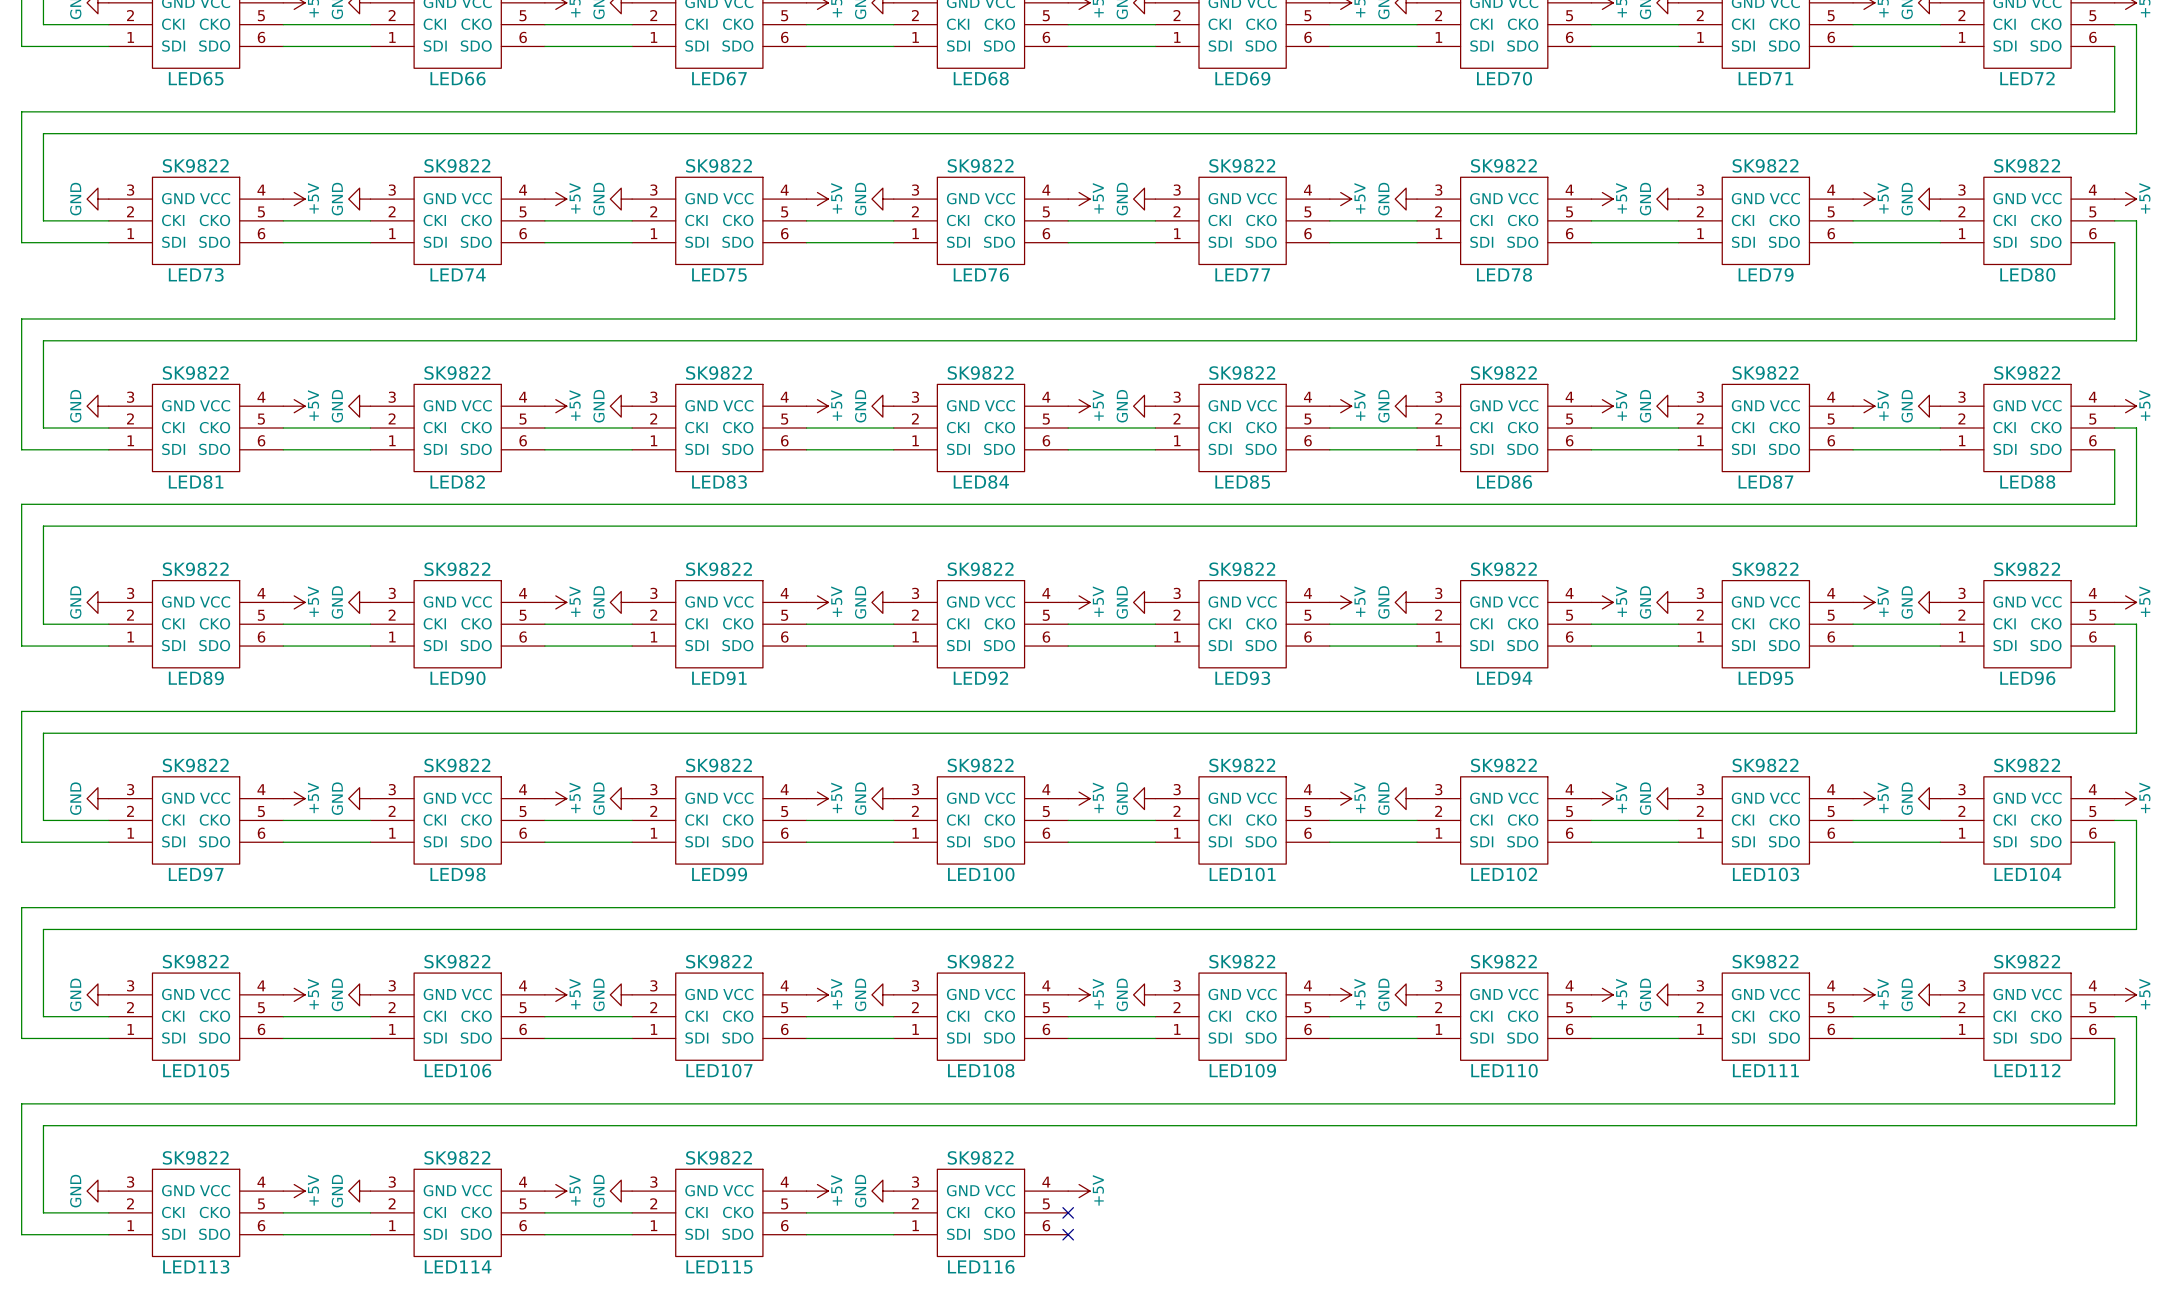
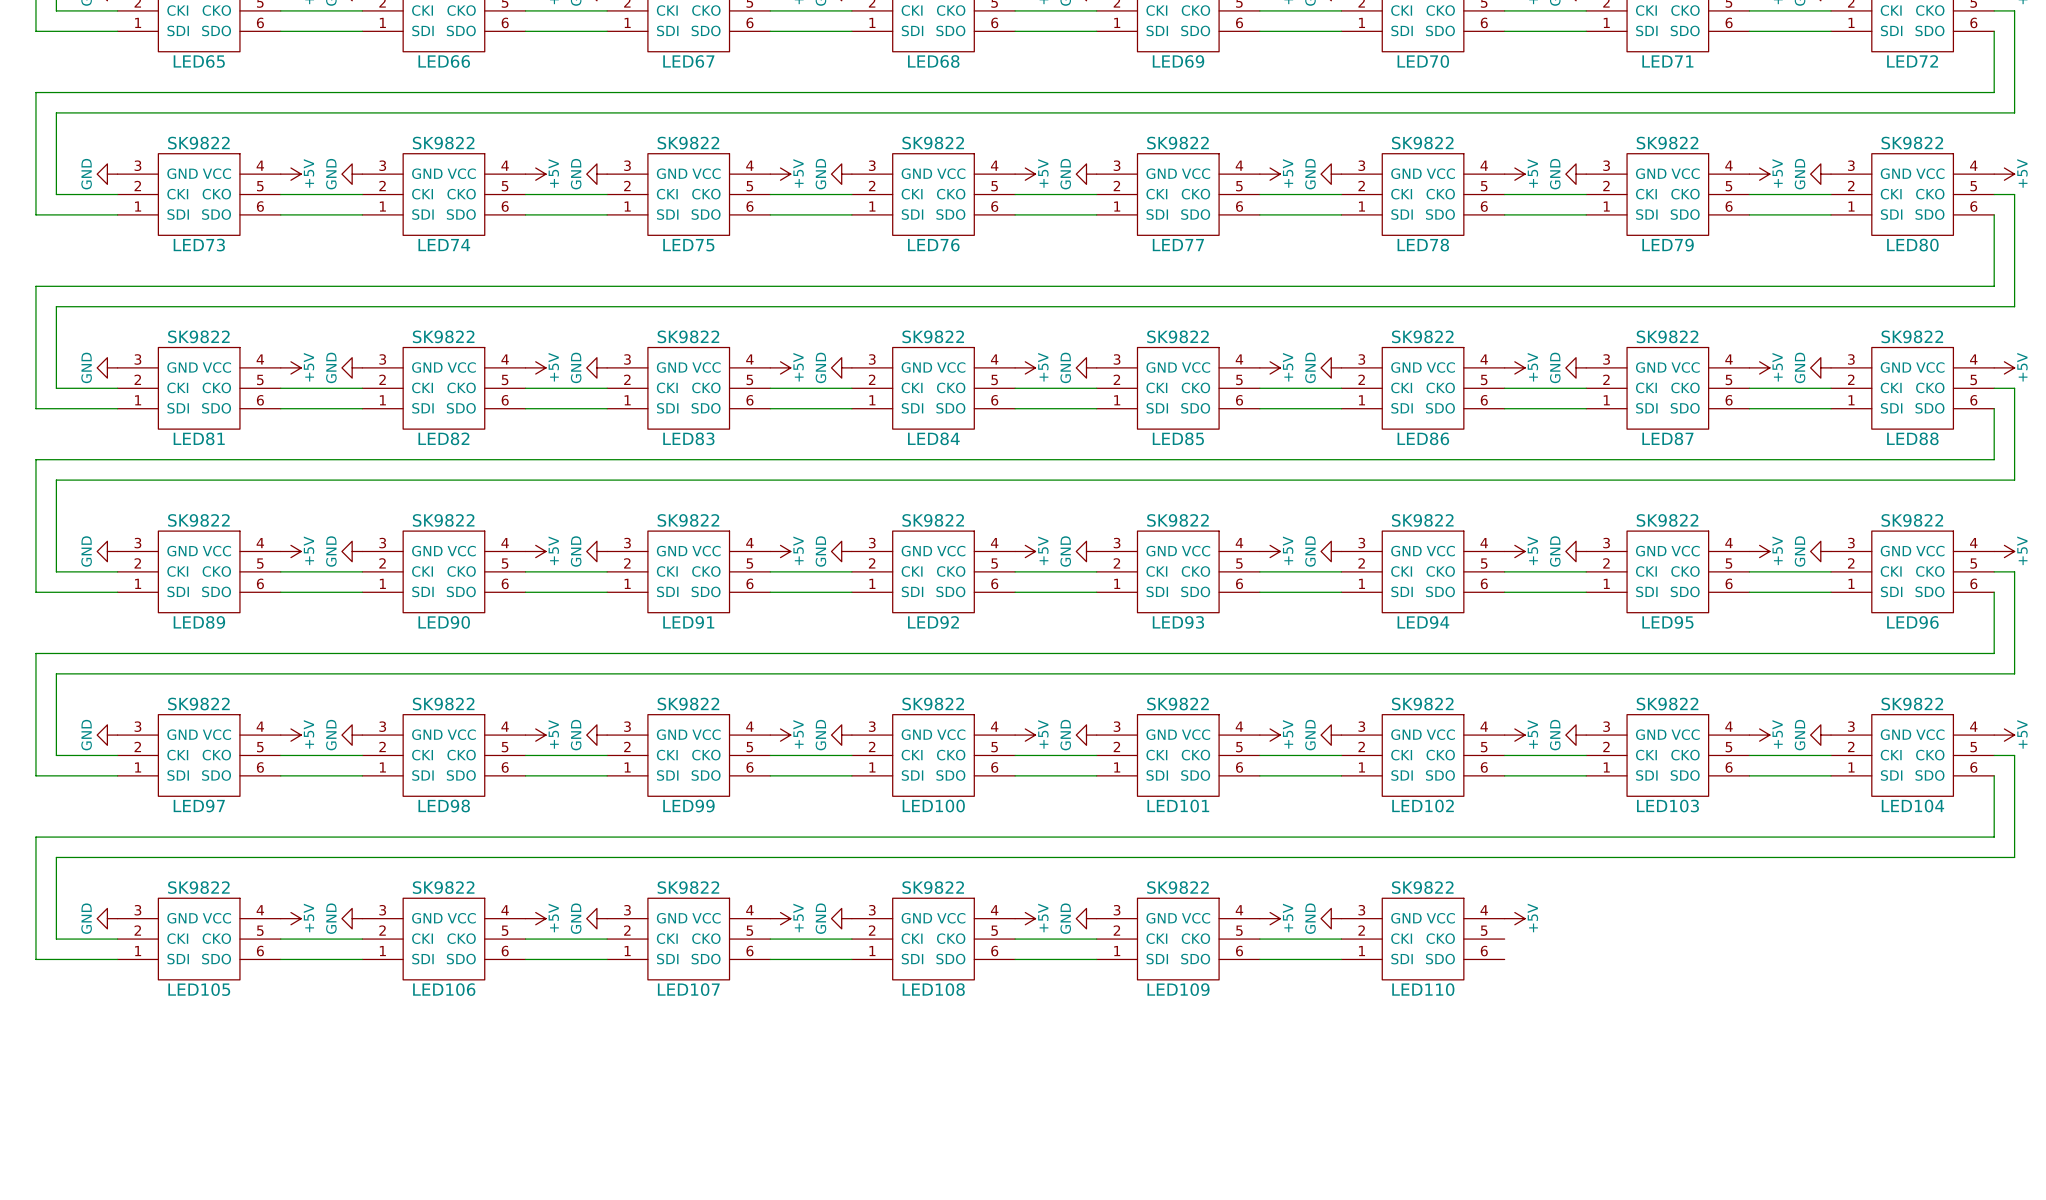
power symbol: GND (1667, 994) -> none
power symbol: +5V (1863, 994) -> none
power symbol: GND (1929, 994) -> none
power symbol: +5V (2125, 994) -> none
wire: (1591, 1016) (1678, 1016) -> none
LED111: SK9822 (1765, 1016) -> none
wire: (1853, 1016) (1940, 1016) -> none
LED112: SK9822 (2027, 1016) -> none
wire: (2114, 1016) (2136, 1016) (2136, 1125) (43, 1125) (43, 1212) (108, 1212) -> none
wire: (1591, 1038) (1678, 1038) -> none
wire: (1853, 1038) (1940, 1038) -> none
wire: (2114, 1038) (2114, 1103) (21, 1103) (21, 1234) (108, 1234) -> none
power symbol: GND (97, 1191) -> none
power symbol: +5V (294, 1191) -> none
power symbol: GND (359, 1191) -> none
power symbol: +5V (555, 1191) -> none
power symbol: GND (621, 1191) -> none
power symbol: +5V (817, 1191) -> none
power symbol: GND (882, 1191) -> none
power symbol: +5V (1079, 1191) -> none
LED113: SK9822 (196, 1212) -> none
wire: (283, 1212) (370, 1212) -> none
LED114: SK9822 (457, 1212) -> none
wire: (544, 1212) (632, 1212) -> none
LED115: SK9822 (719, 1212) -> none
wire: (806, 1212) (893, 1212) -> none
LED116: SK9822 (980, 1212) -> none
no-connect mark: (1068, 1212) -> none
wire: (283, 1234) (370, 1234) -> none
wire: (544, 1234) (632, 1234) -> none
wire: (806, 1234) (893, 1234) -> none
no-connect mark: (1068, 1234) -> none

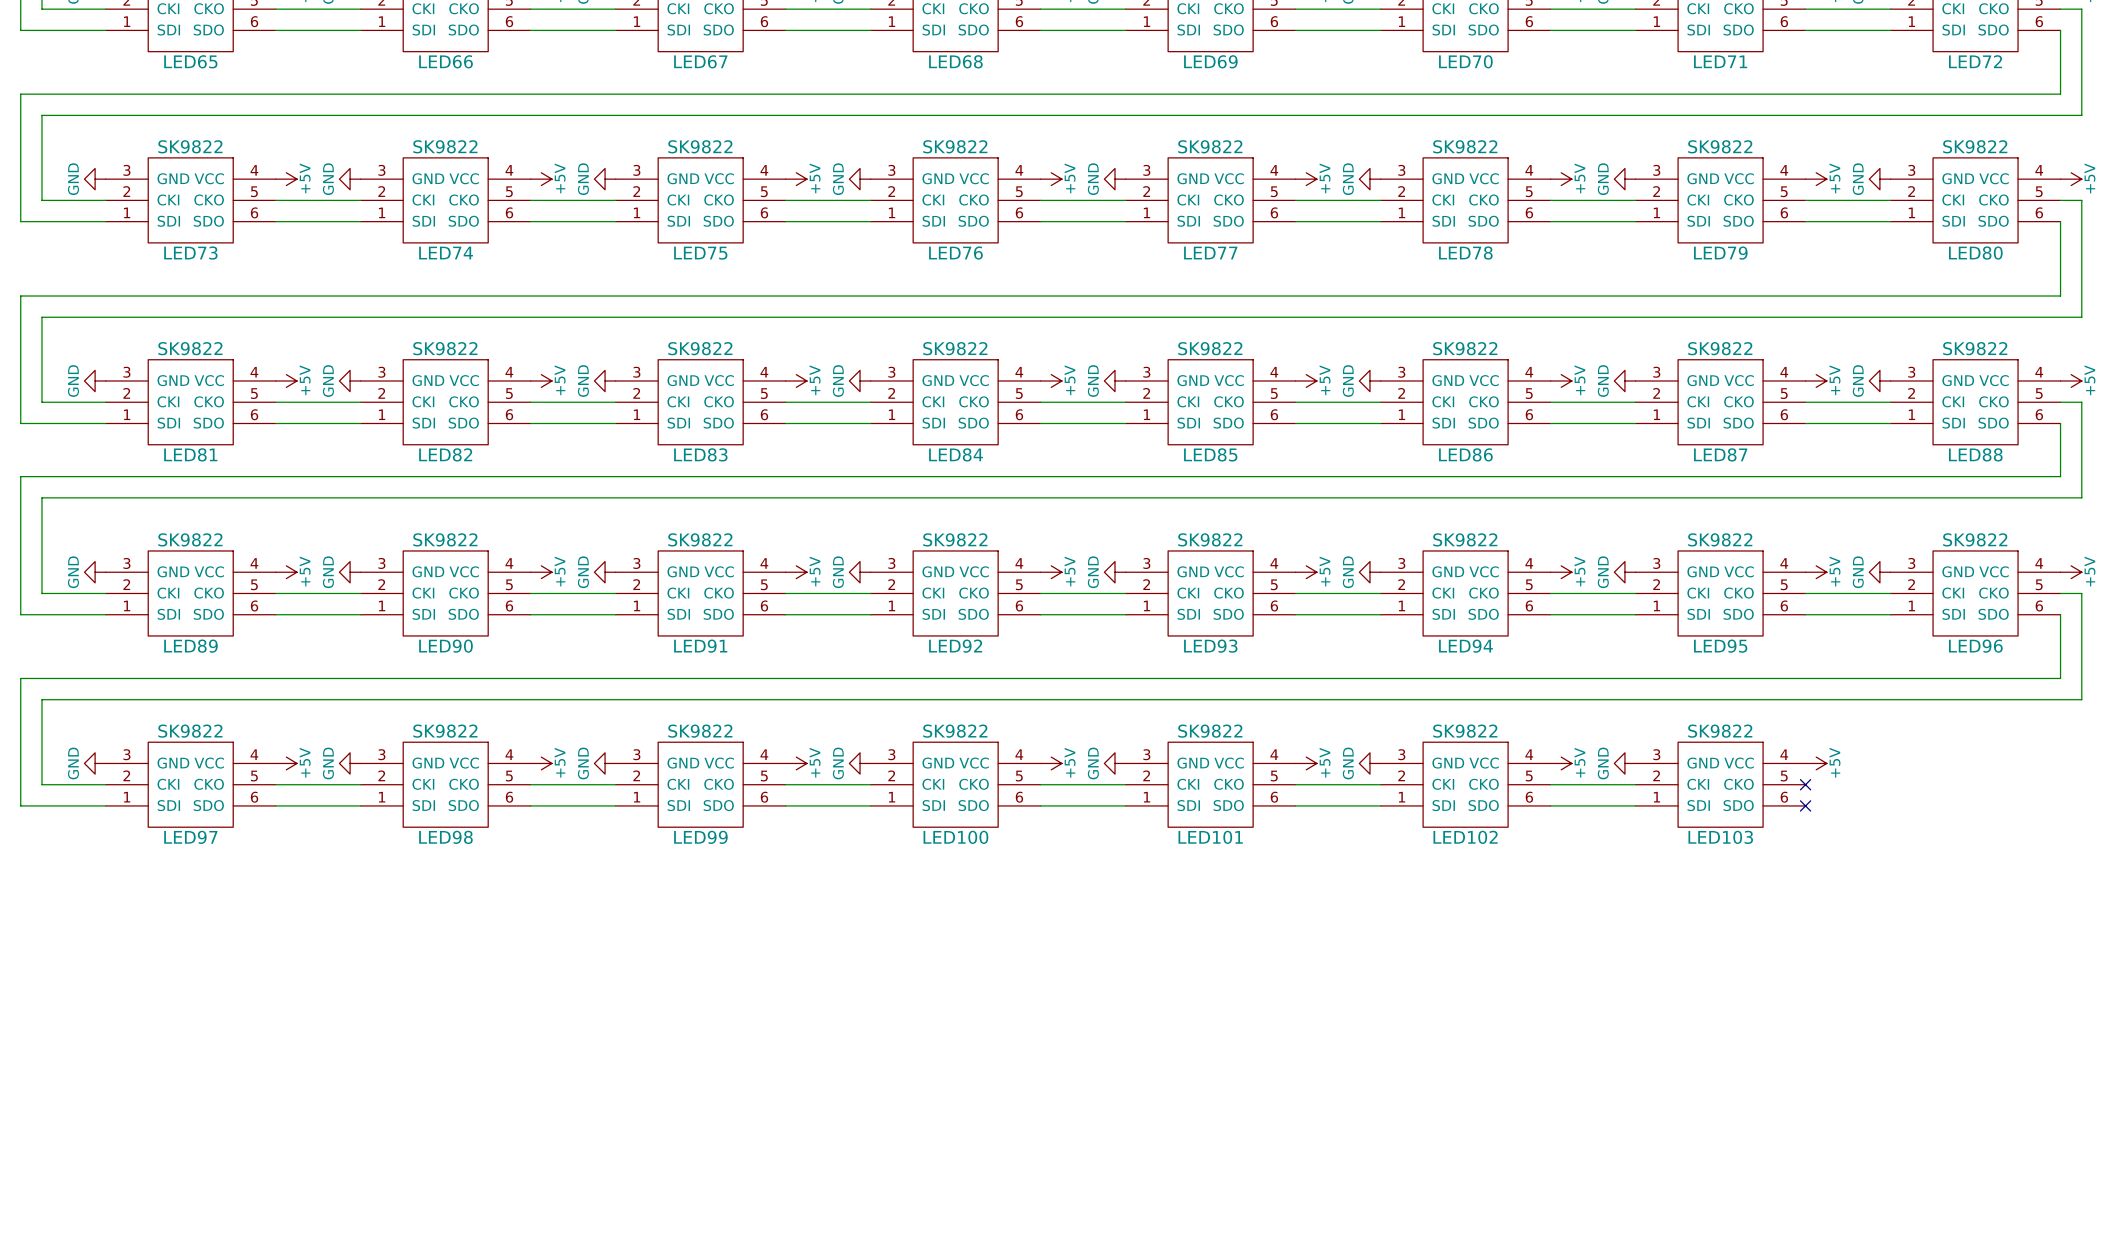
power symbol: GND (1820, 735) -> none
power symbol: +5V (2004, 735) -> none
wire: (1749, 755) (1831, 755) -> none
no-connect mark: none -> (1805, 784)
LED104: SK9822 (1912, 755) -> none
wire: (1994, 755) (2014, 755) (2014, 857) (56, 857) (56, 939) (117, 939) -> none
wire: (1749, 775) (1831, 775) -> none
no-connect mark: none -> (1805, 805)
wire: (1994, 775) (1994, 837) (35, 837) (35, 959) (117, 959) -> none
power symbol: GND (107, 918) -> none
power symbol: +5V (290, 918) -> none
power symbol: GND (352, 918) -> none
power symbol: +5V (535, 918) -> none
power symbol: GND (596, 918) -> none
power symbol: +5V (780, 918) -> none
power symbol: GND (841, 918) -> none
power symbol: +5V (1025, 918) -> none
power symbol: GND (1086, 918) -> none
power symbol: +5V (1270, 918) -> none
power symbol: GND (1331, 918) -> none
power symbol: +5V (1514, 918) -> none
LED105: SK9822 (199, 939) -> none
wire: (280, 939) (362, 939) -> none
LED106: SK9822 (443, 939) -> none
wire: (525, 939) (607, 939) -> none
LED107: SK9822 (688, 939) -> none
wire: (770, 939) (851, 939) -> none
LED108: SK9822 (933, 939) -> none
wire: (1015, 939) (1096, 939) -> none
LED109: SK9822 (1178, 939) -> none
wire: (1259, 939) (1341, 939) -> none
LED110: SK9822 (1423, 939) -> none
wire: (280, 959) (362, 959) -> none
wire: (525, 959) (607, 959) -> none
wire: (770, 959) (851, 959) -> none
wire: (1015, 959) (1096, 959) -> none
wire: (1259, 959) (1341, 959) -> none

